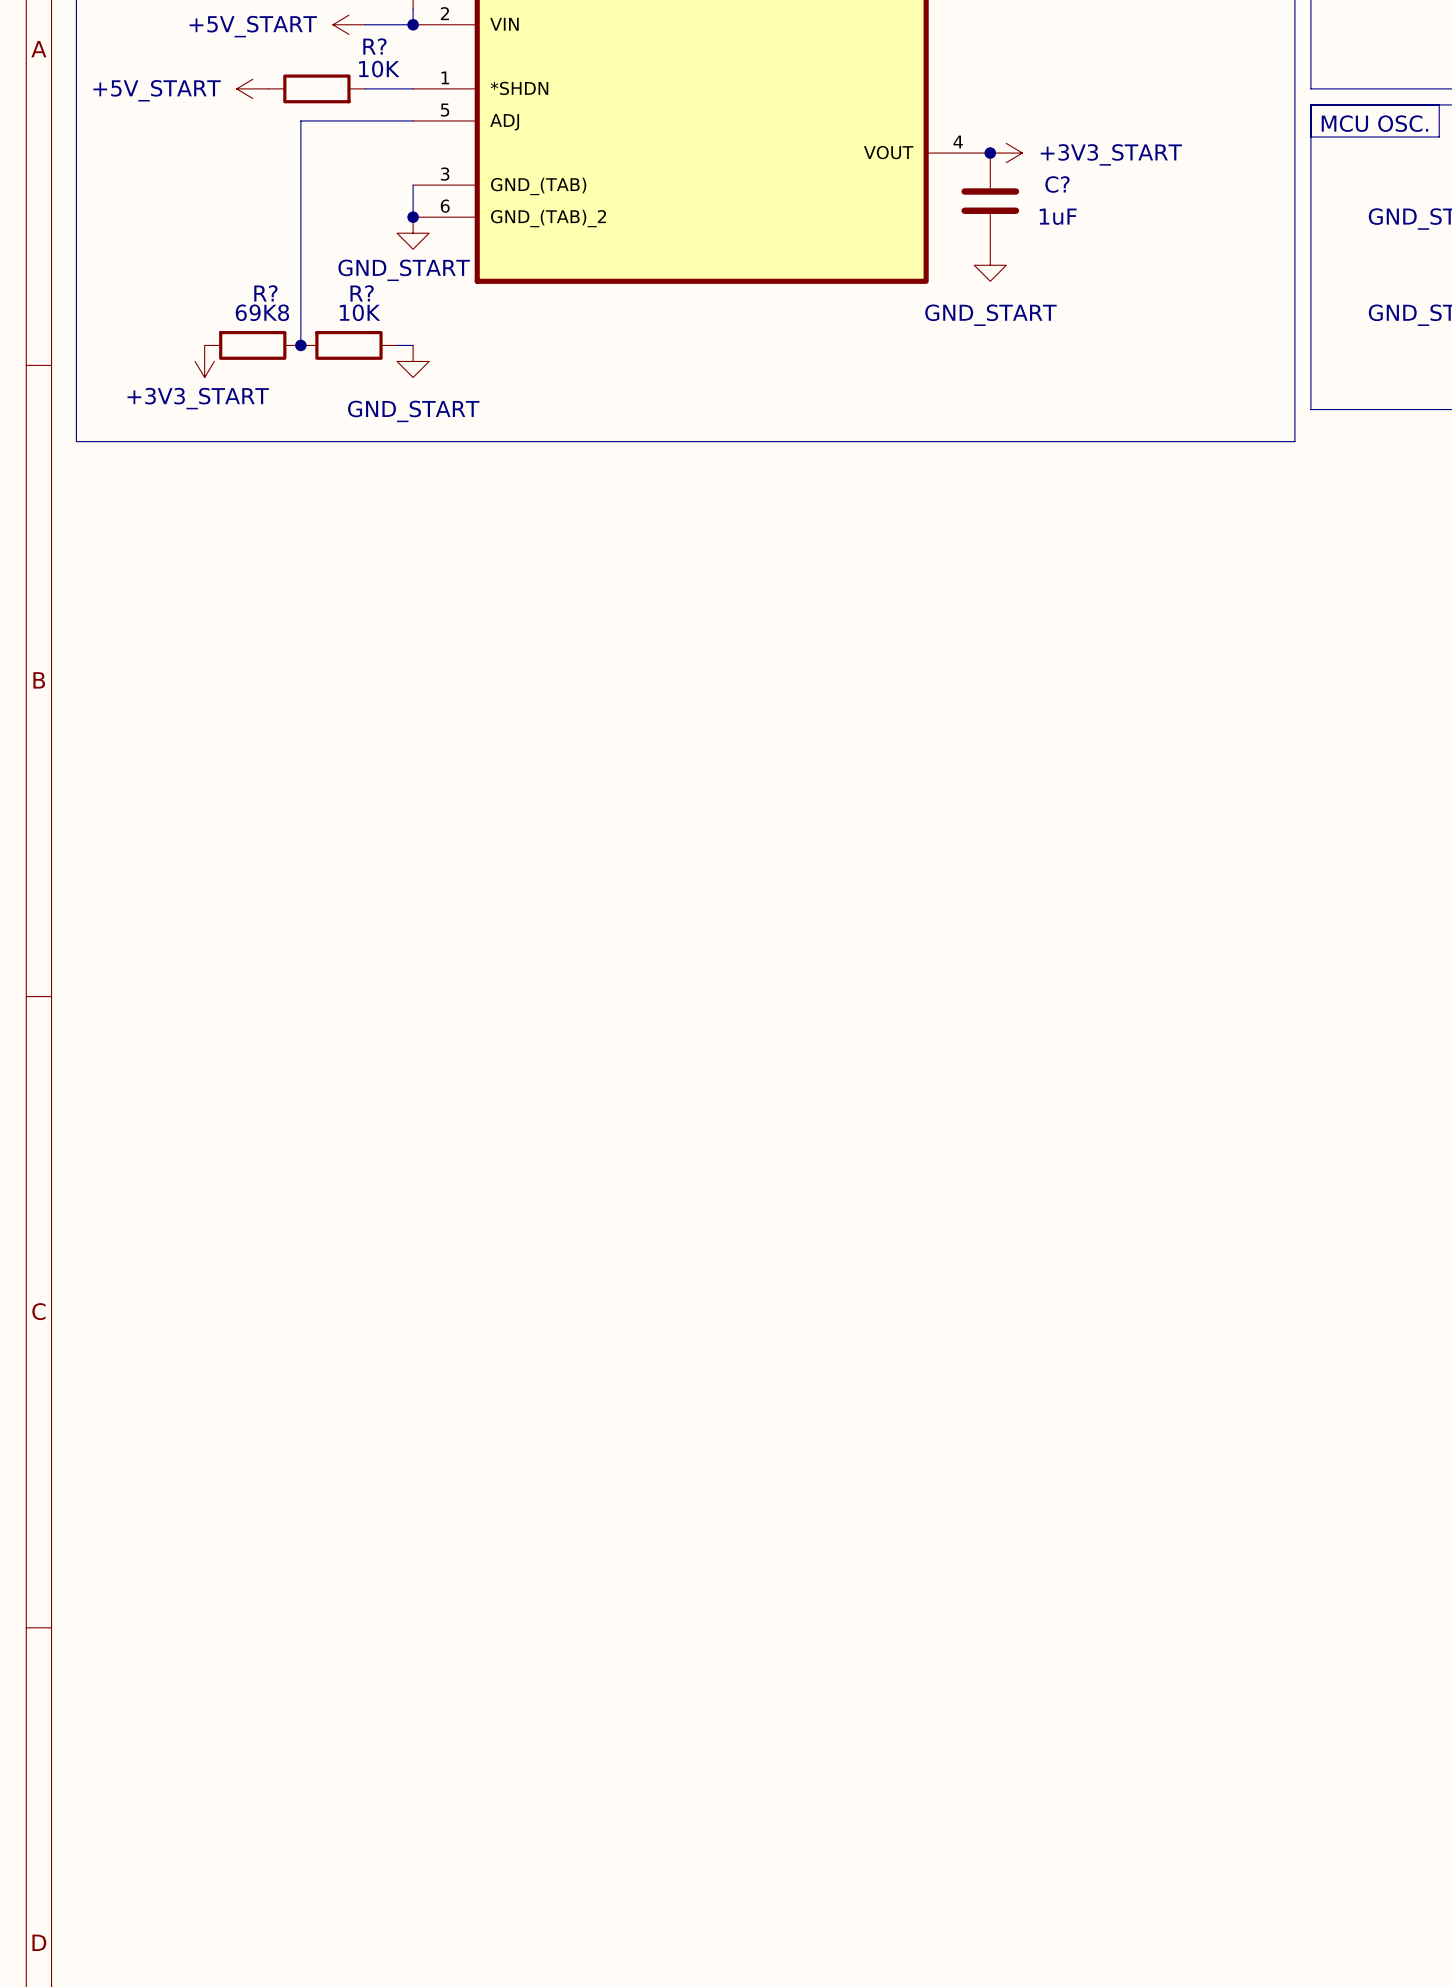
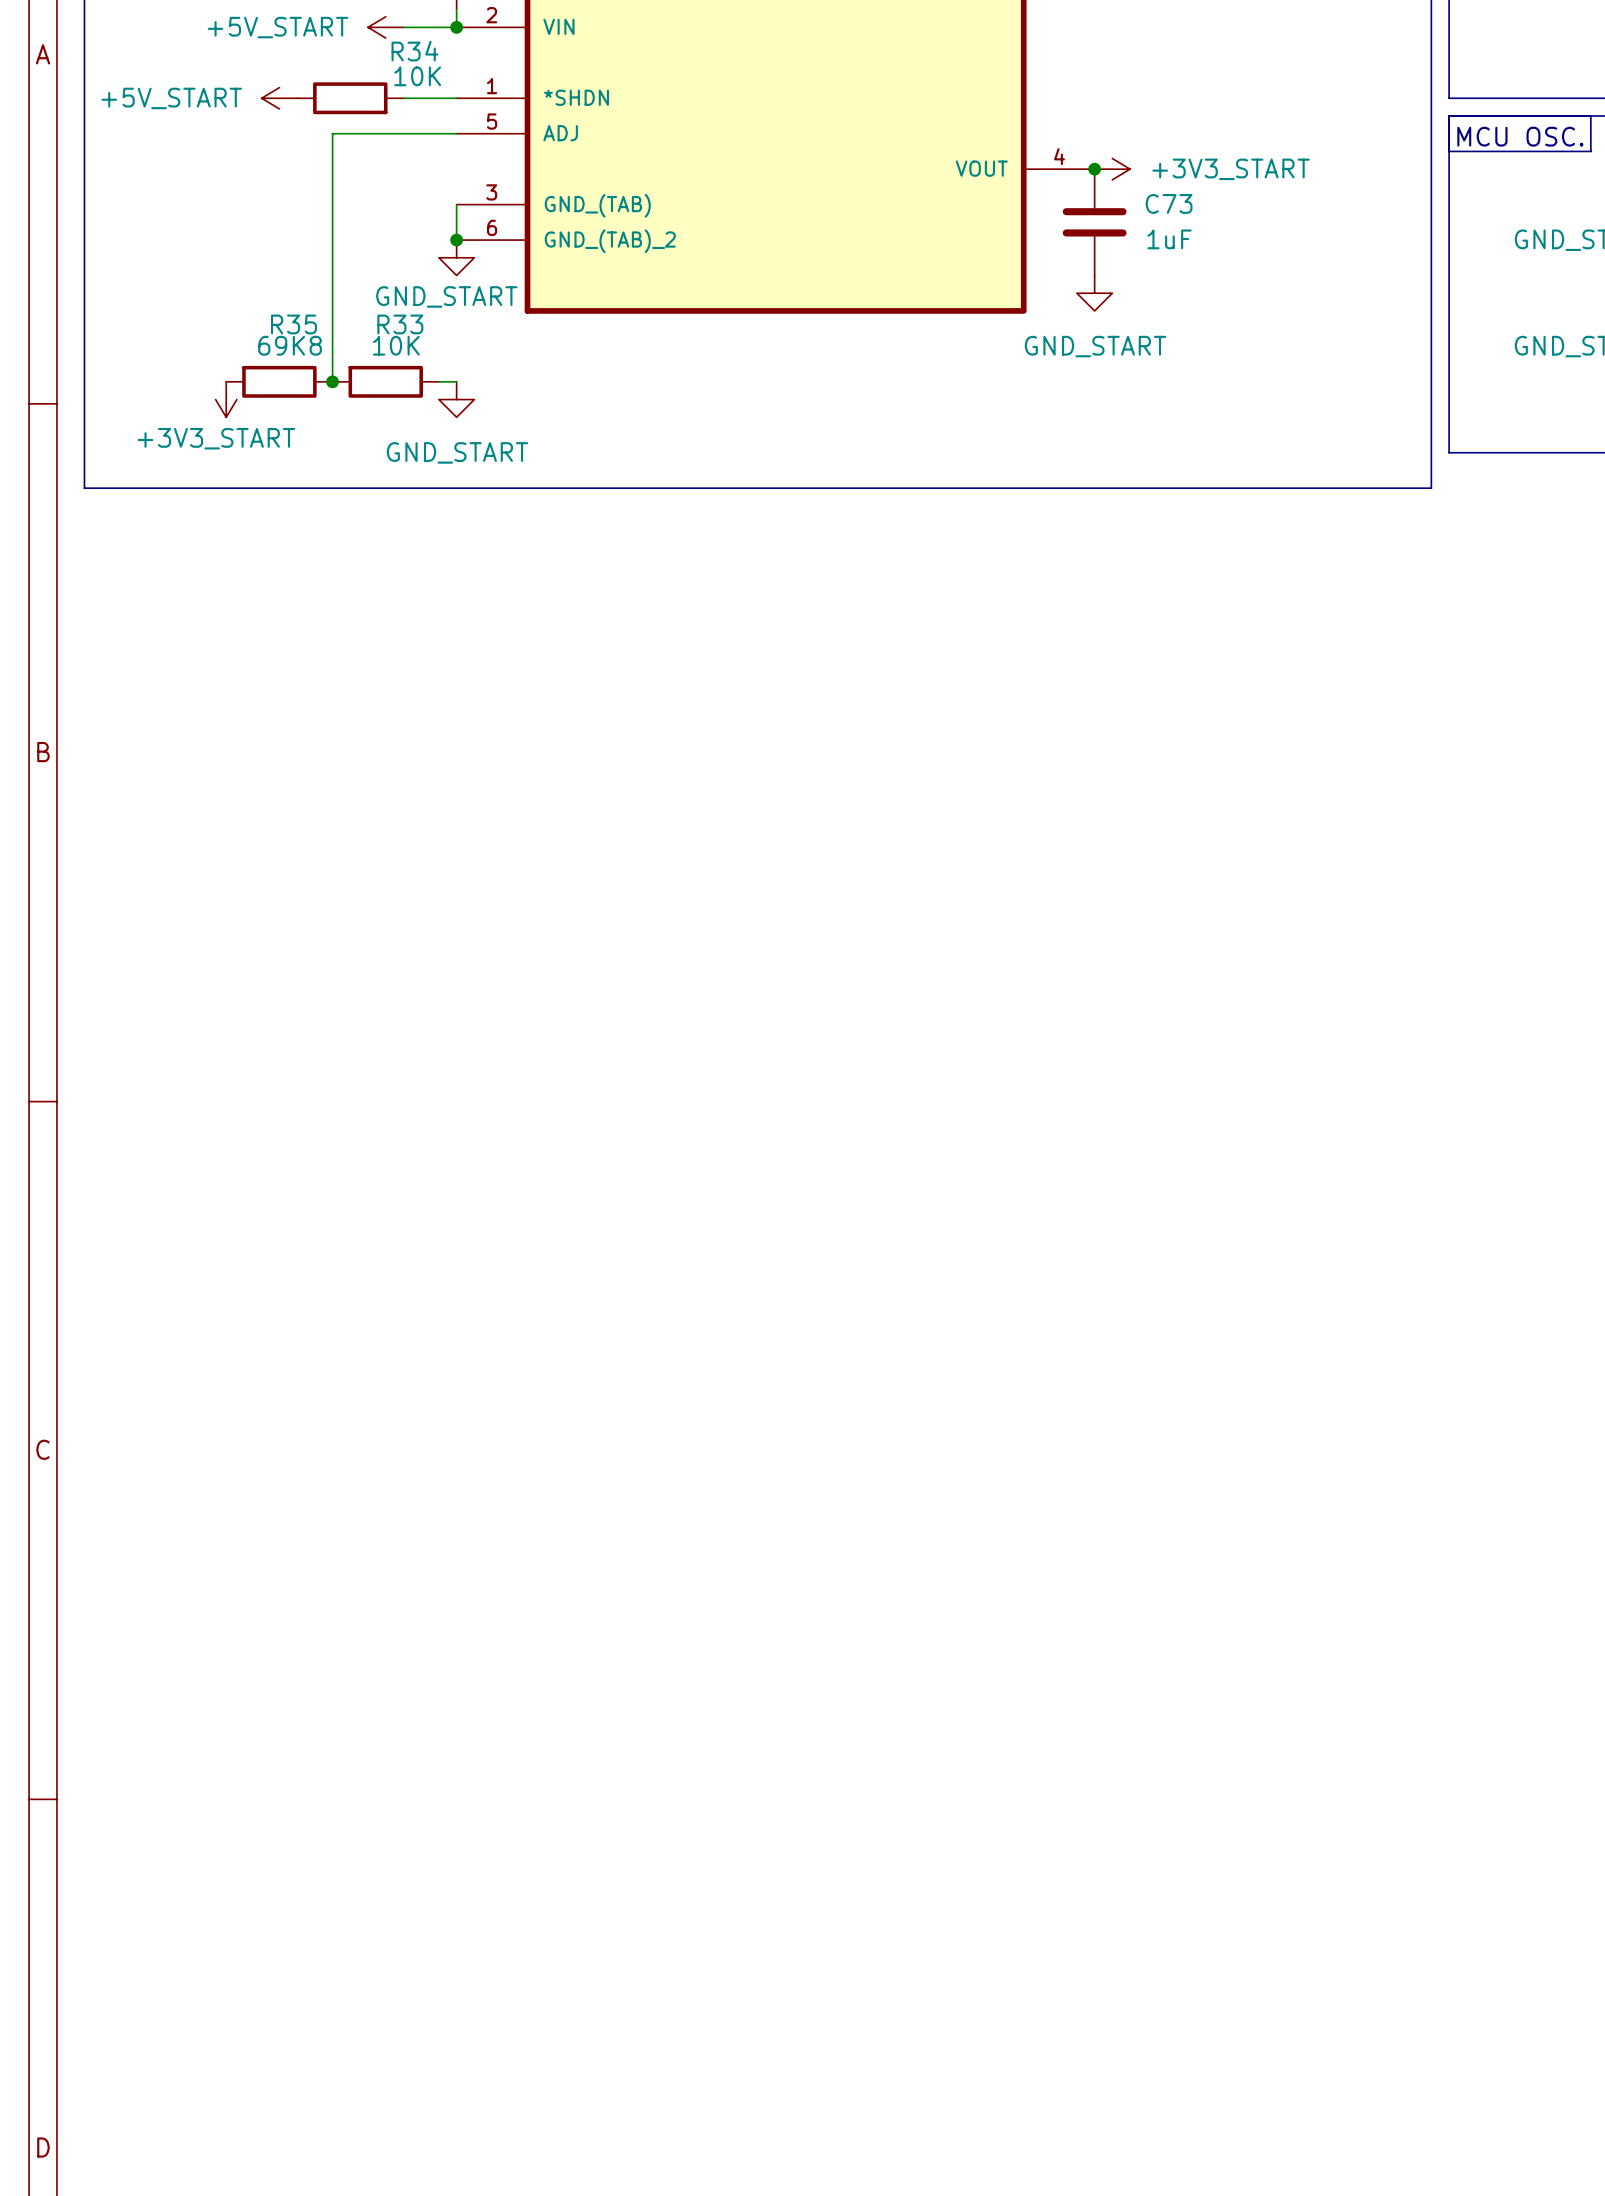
R? name: R? (374, 46) -> R34 (414, 51)
C? name: C? (1057, 184) -> C73 (1169, 203)
R? name: R? (265, 293) -> R35 (294, 324)
R? name: R? (362, 293) -> R33 (400, 324)

